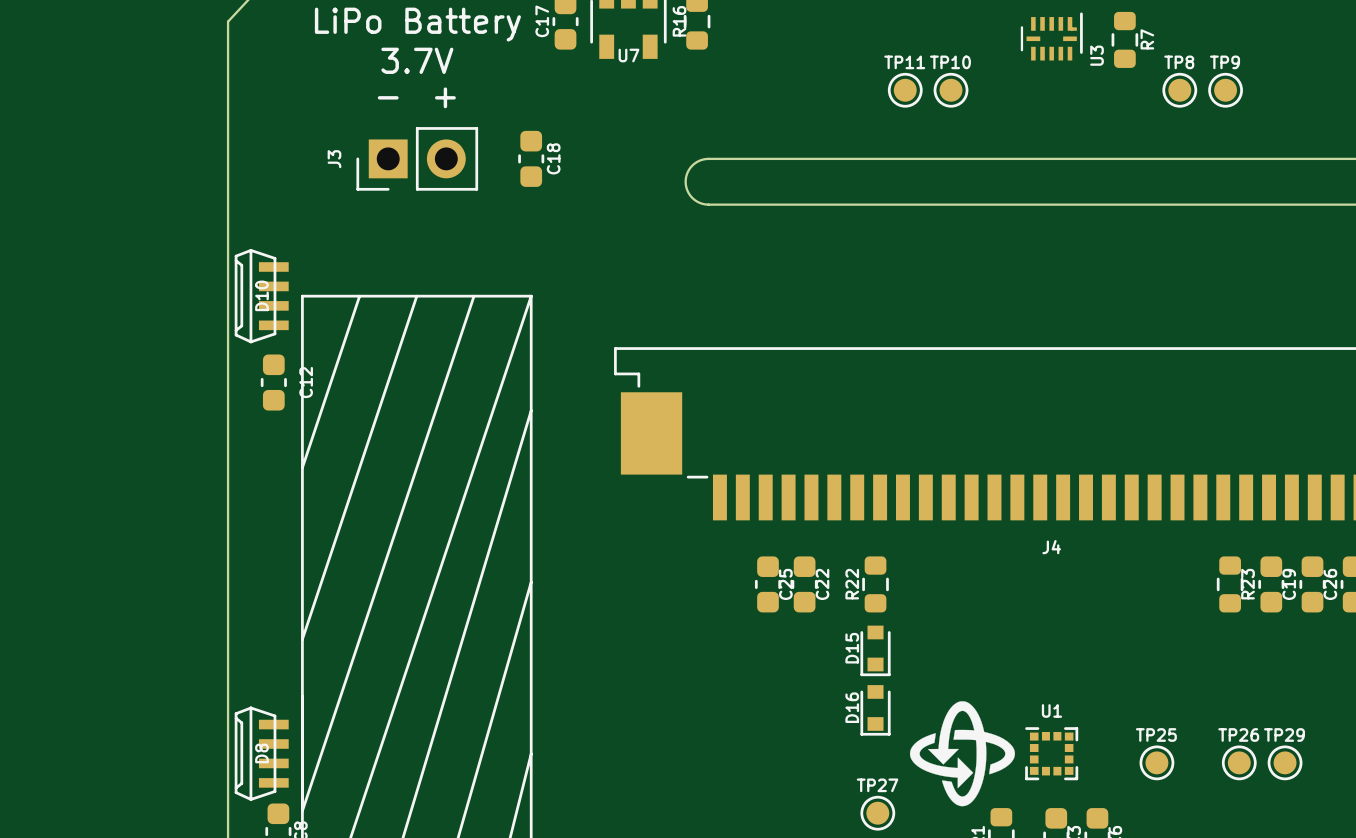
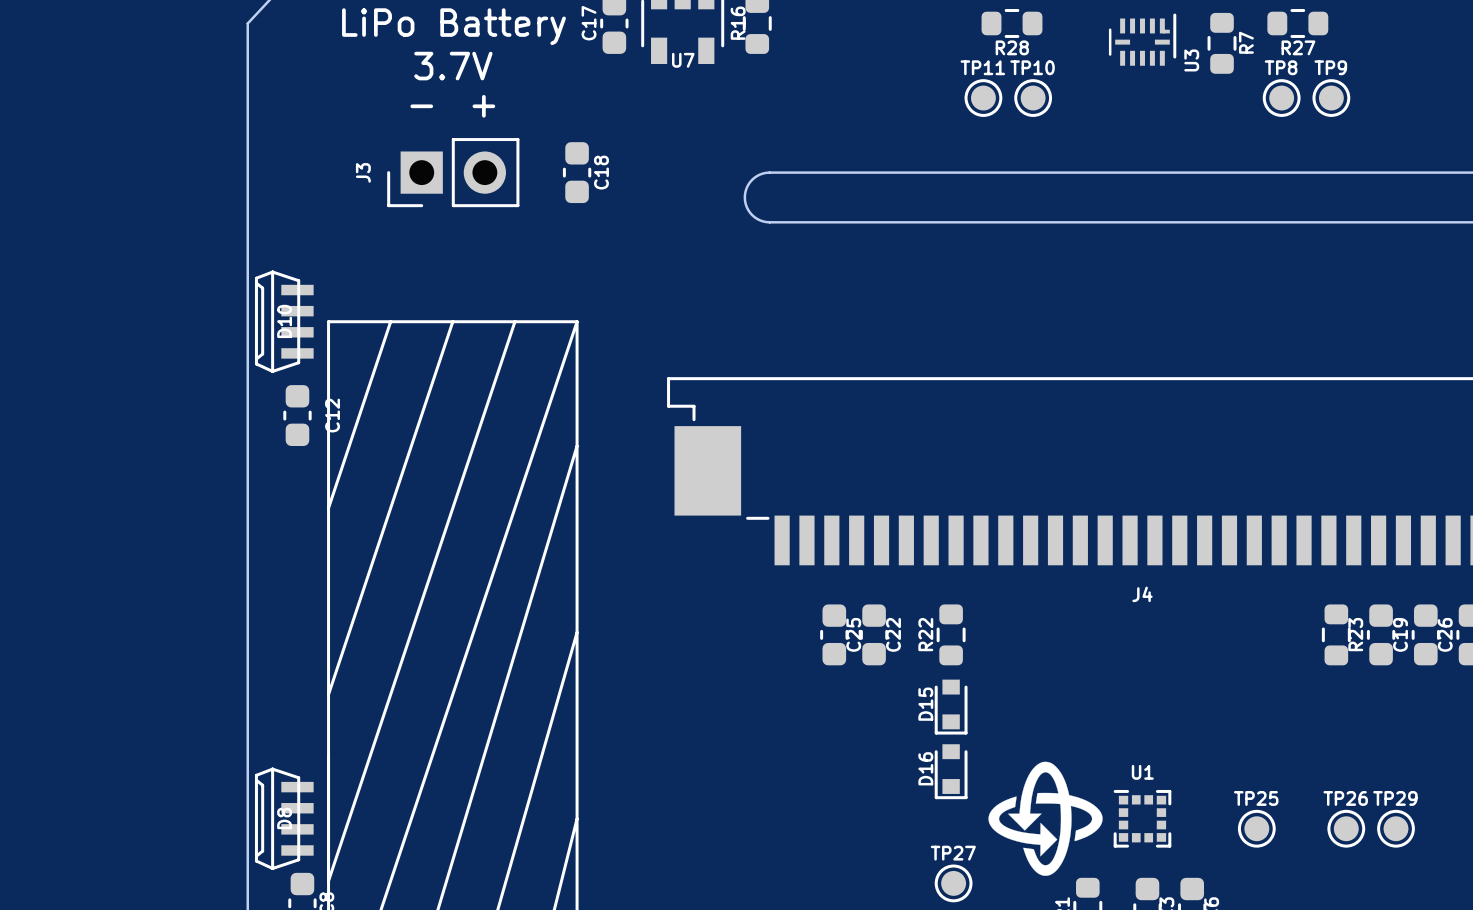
R28: none -> (1012, 23)
R27: none -> (1297, 23)

